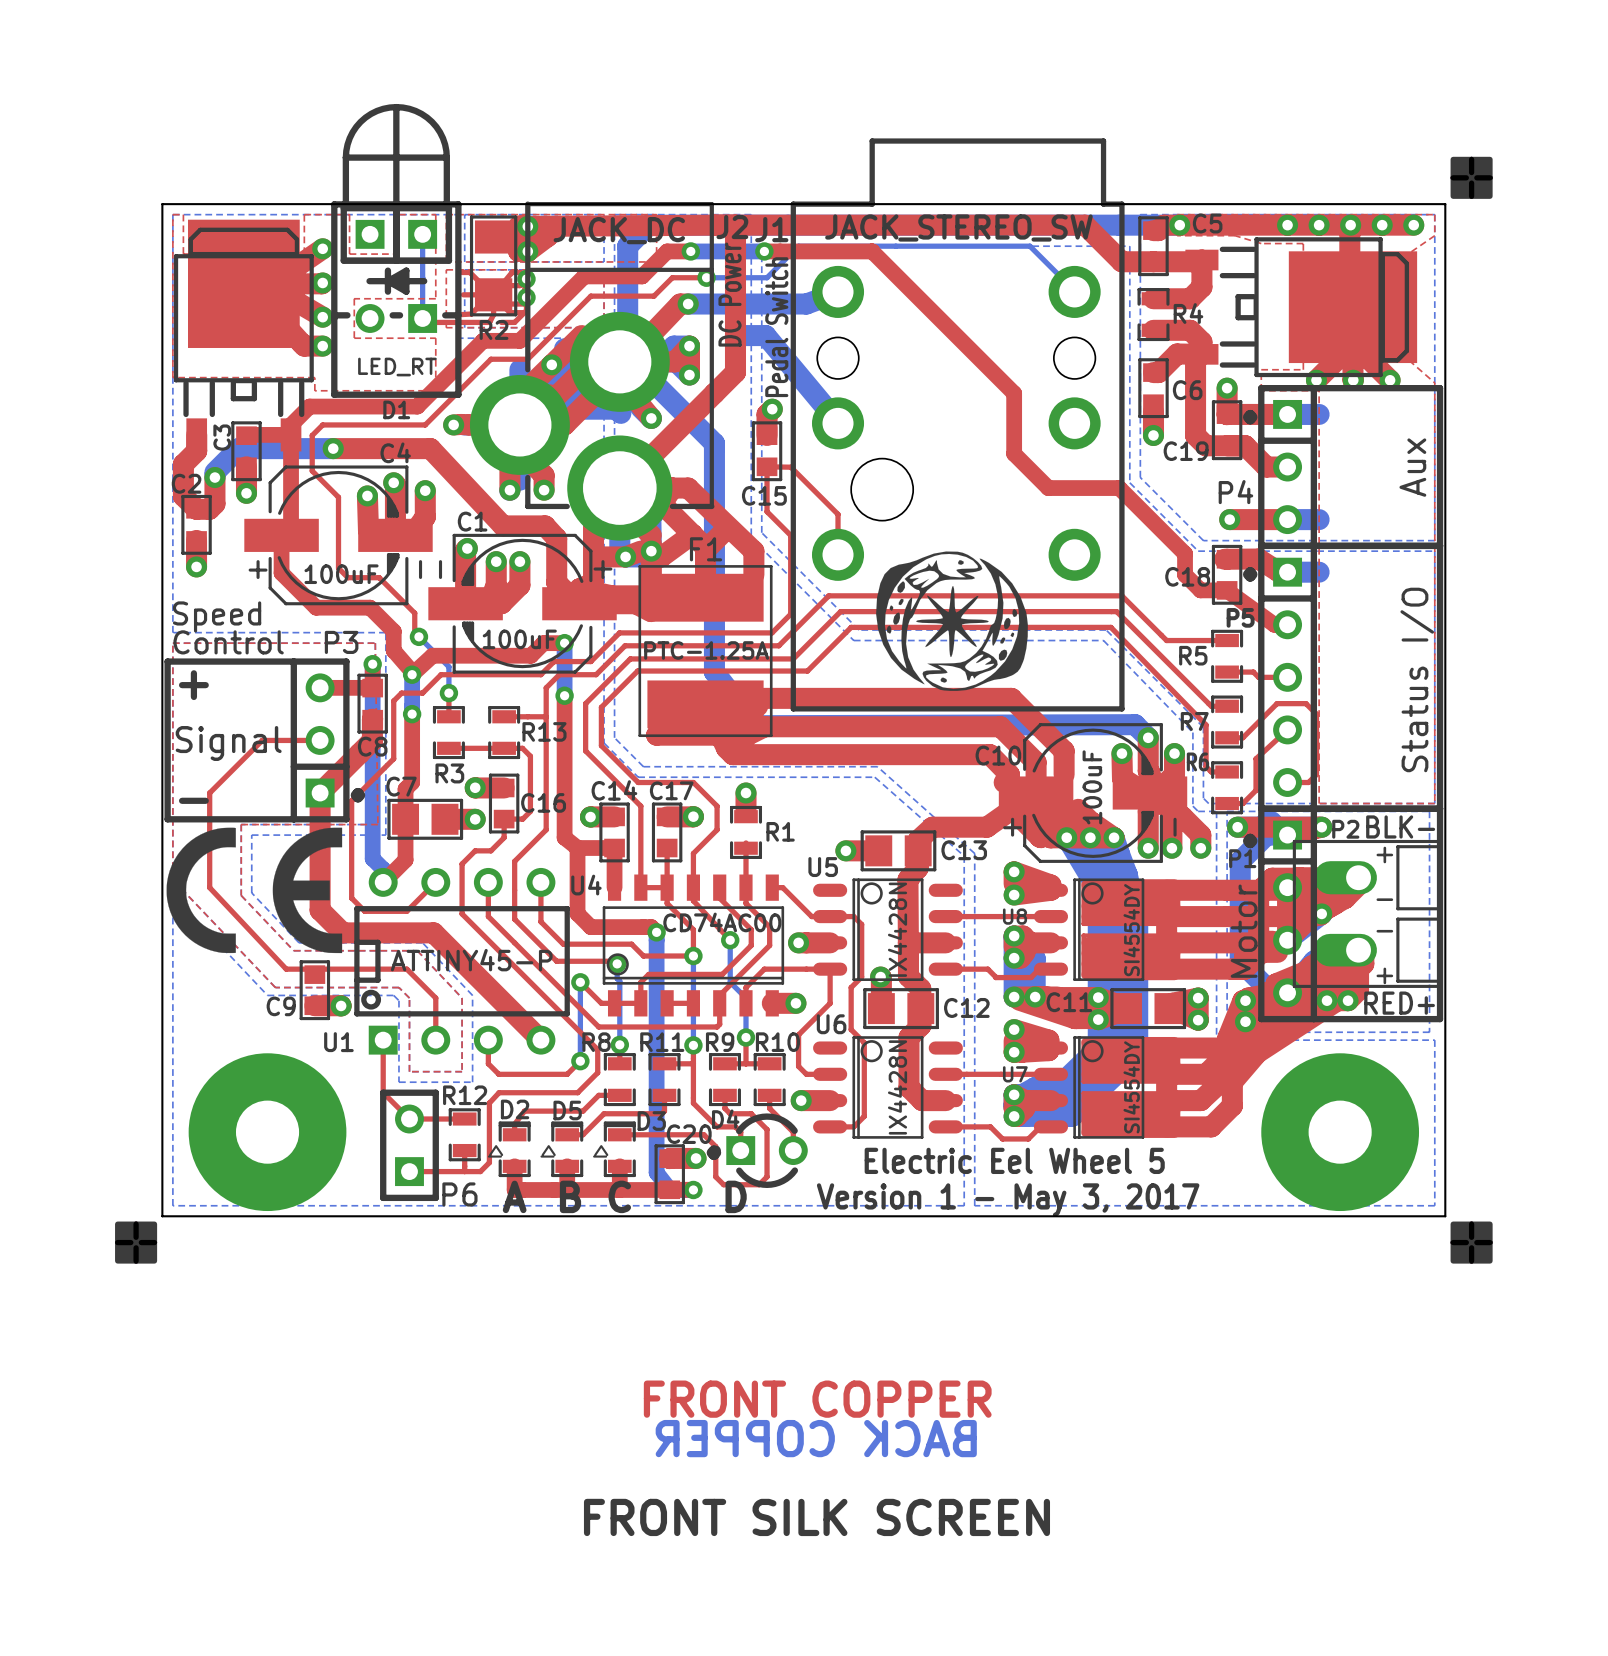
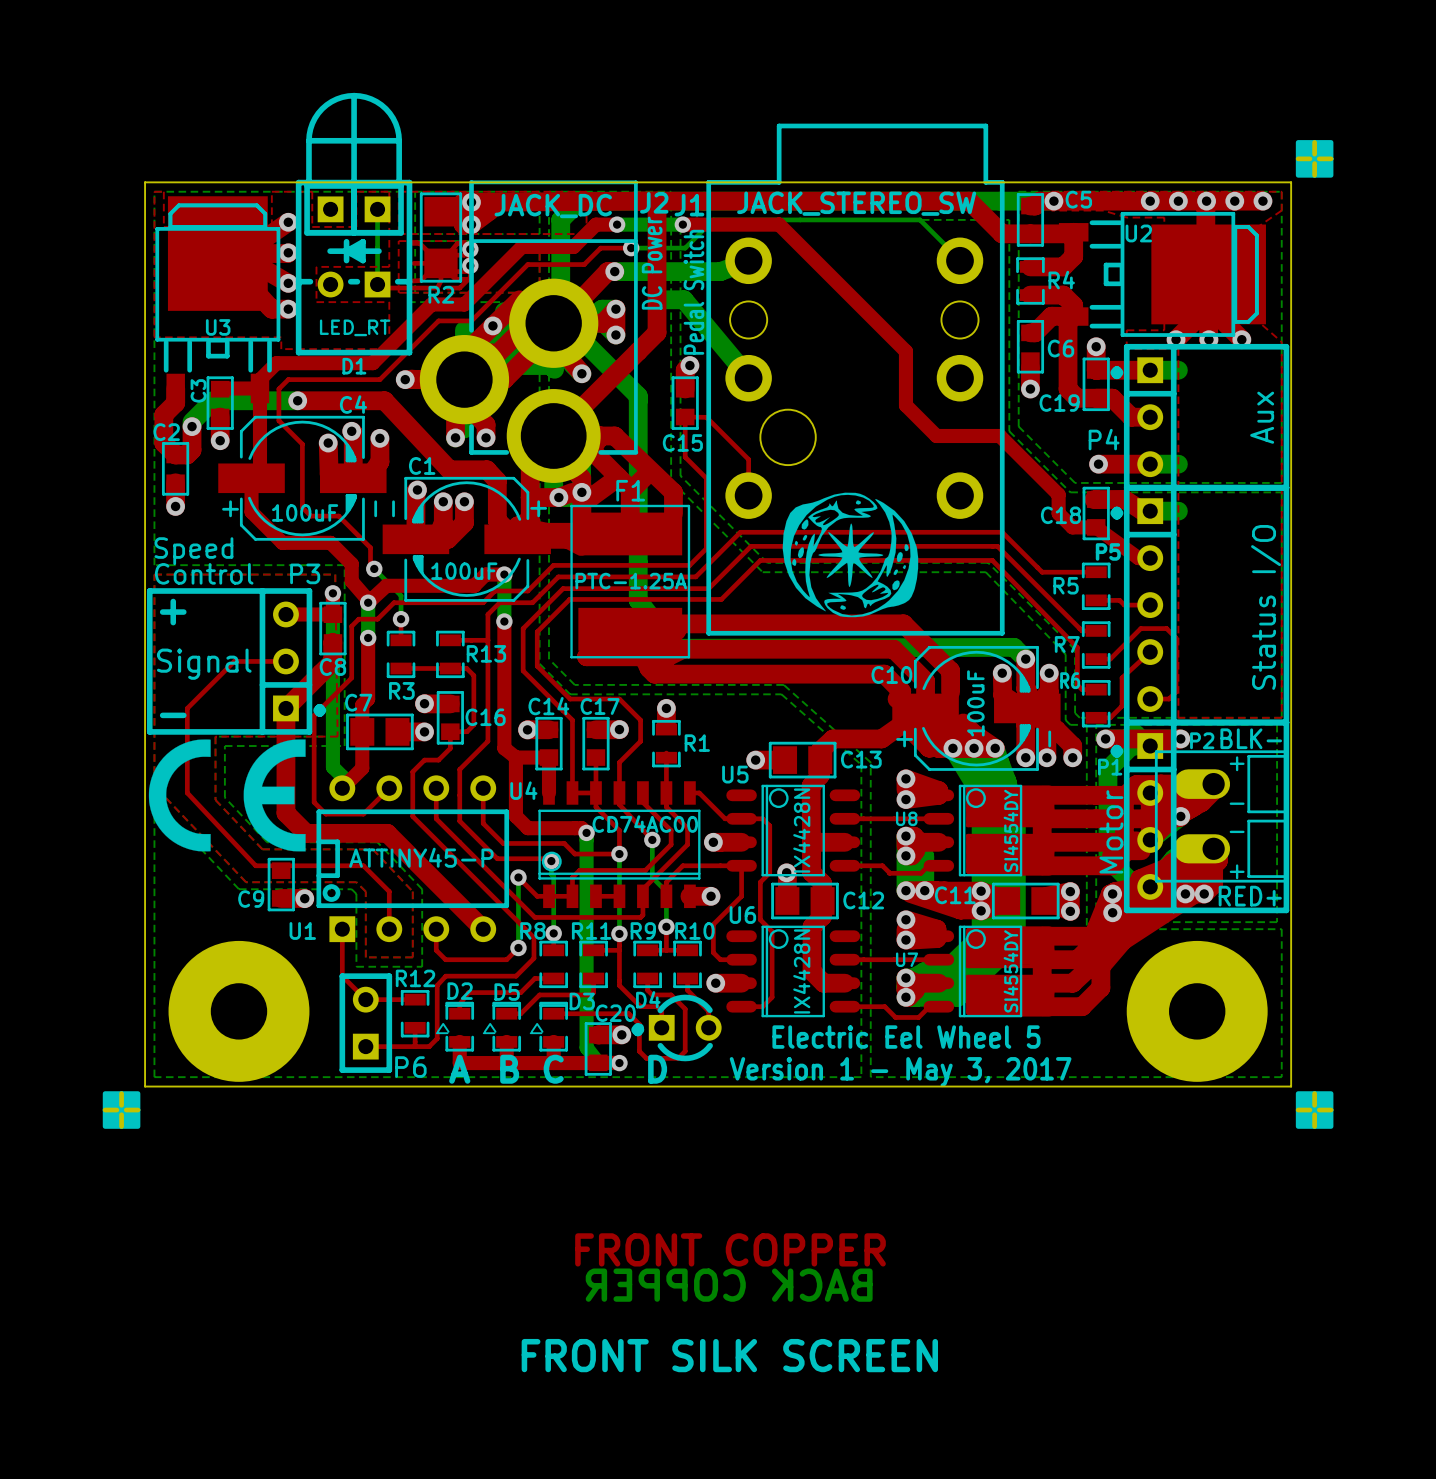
U2 name: none -> U2 (1138, 233)
U3 name: none -> U3 (218, 327)

